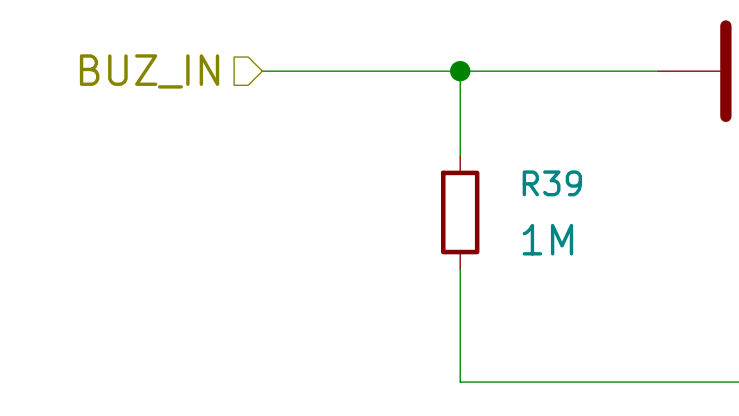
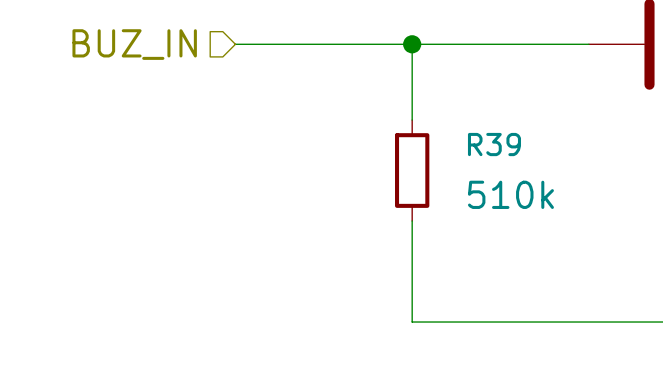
R39 value: 1M (547, 239) -> 510k (510, 194)

